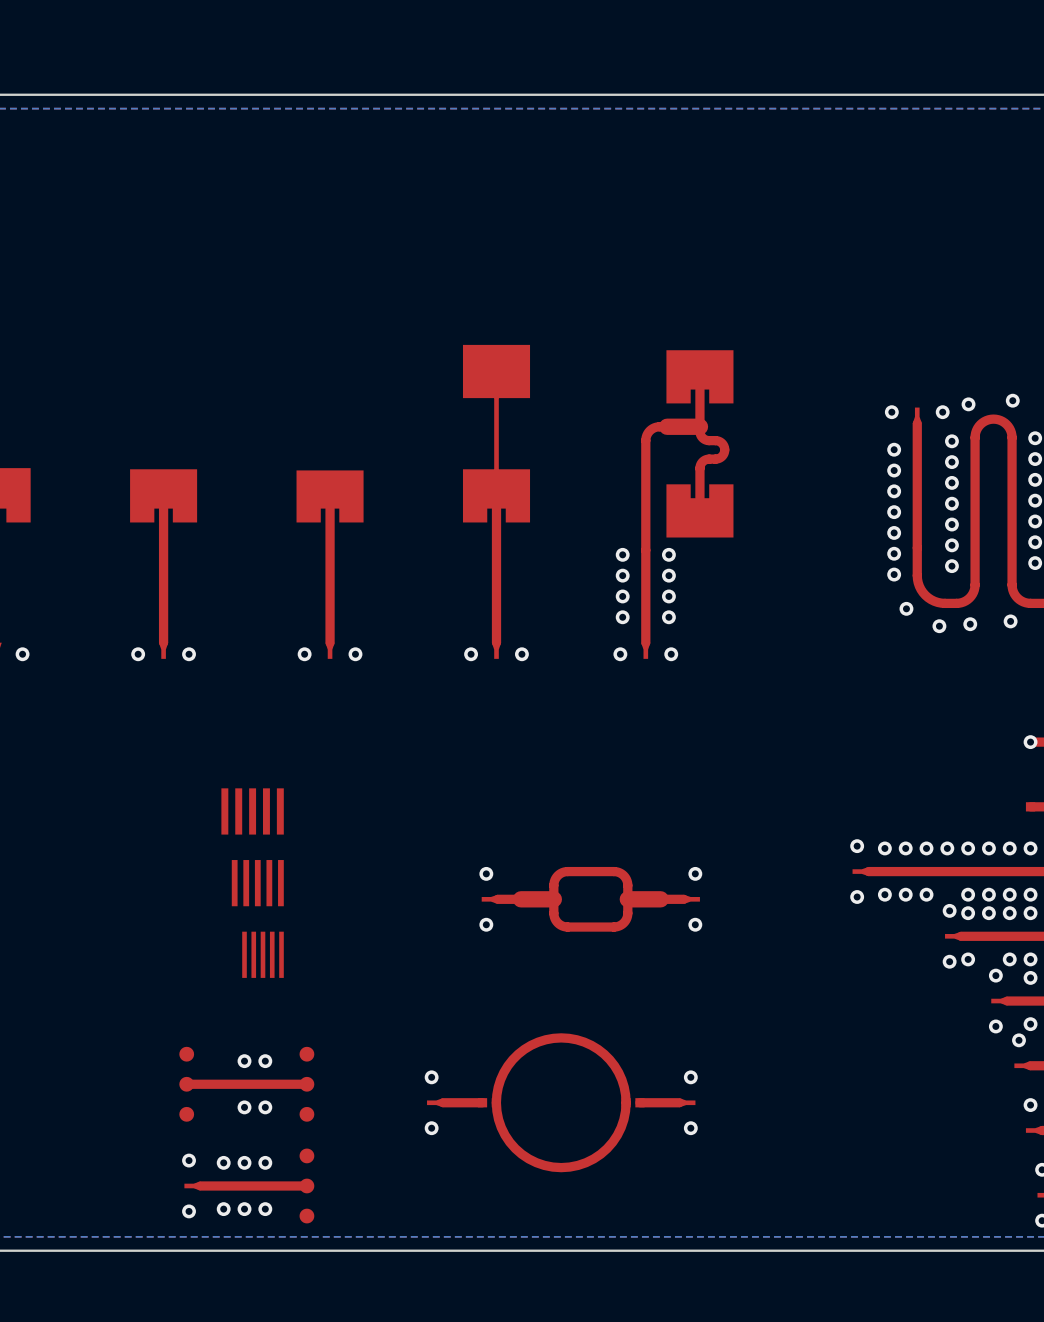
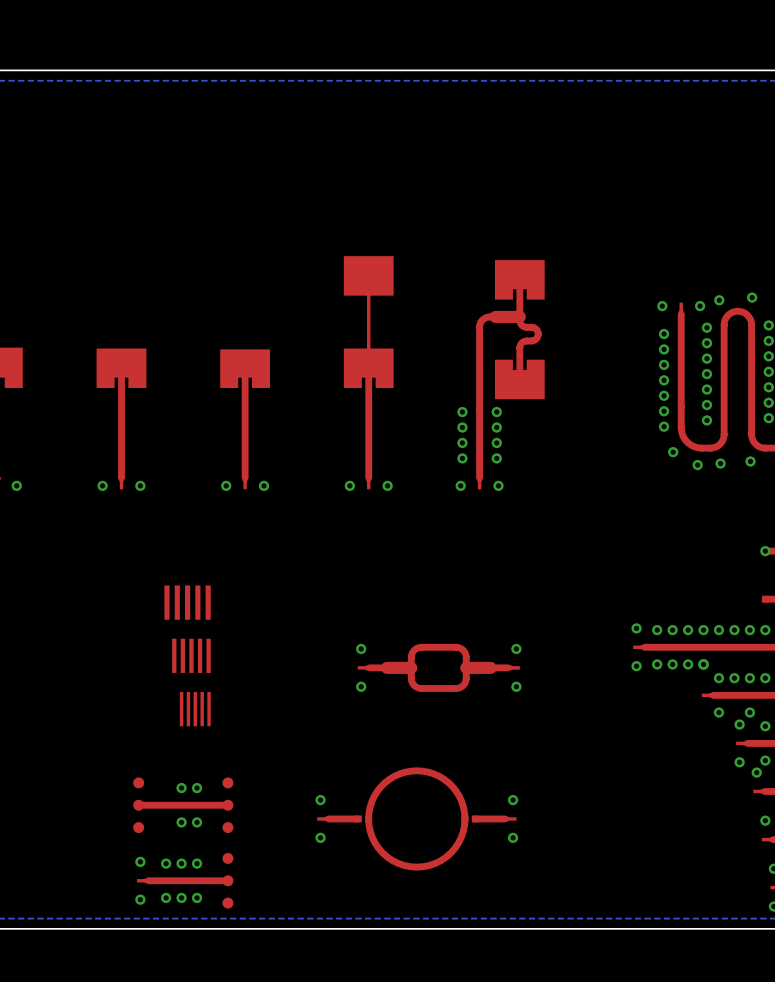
via: none -> (703, 664)
via: (968, 894) -> none
via: (988, 894) -> none
via: (1009, 894) -> none
via: (1030, 894) -> none
via: (949, 910) -> none
via: (1030, 959) -> none
via: (949, 961) -> none

